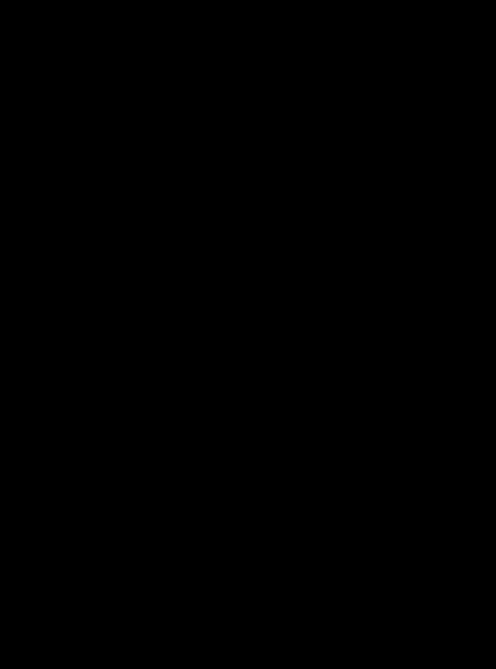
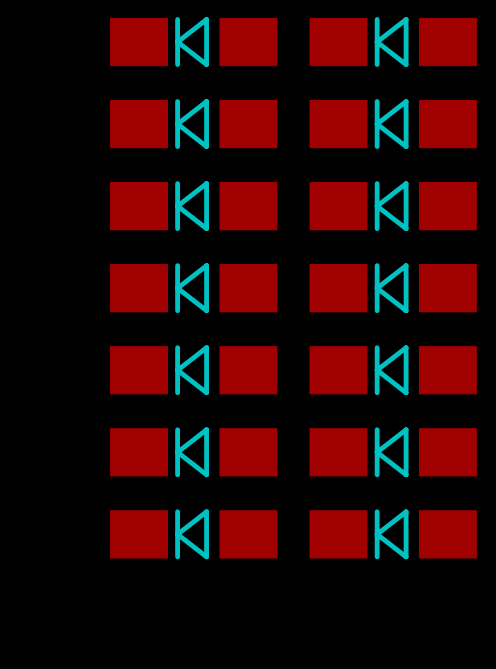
part: none -> (193, 42)
part: none -> (393, 42)
part: none -> (193, 124)
part: none -> (393, 124)
part: none -> (193, 206)
part: none -> (393, 206)
part: none -> (193, 288)
part: none -> (393, 288)
part: none -> (193, 370)
part: none -> (393, 370)
part: none -> (193, 452)
part: none -> (393, 452)
part: none -> (193, 534)
part: none -> (393, 534)

